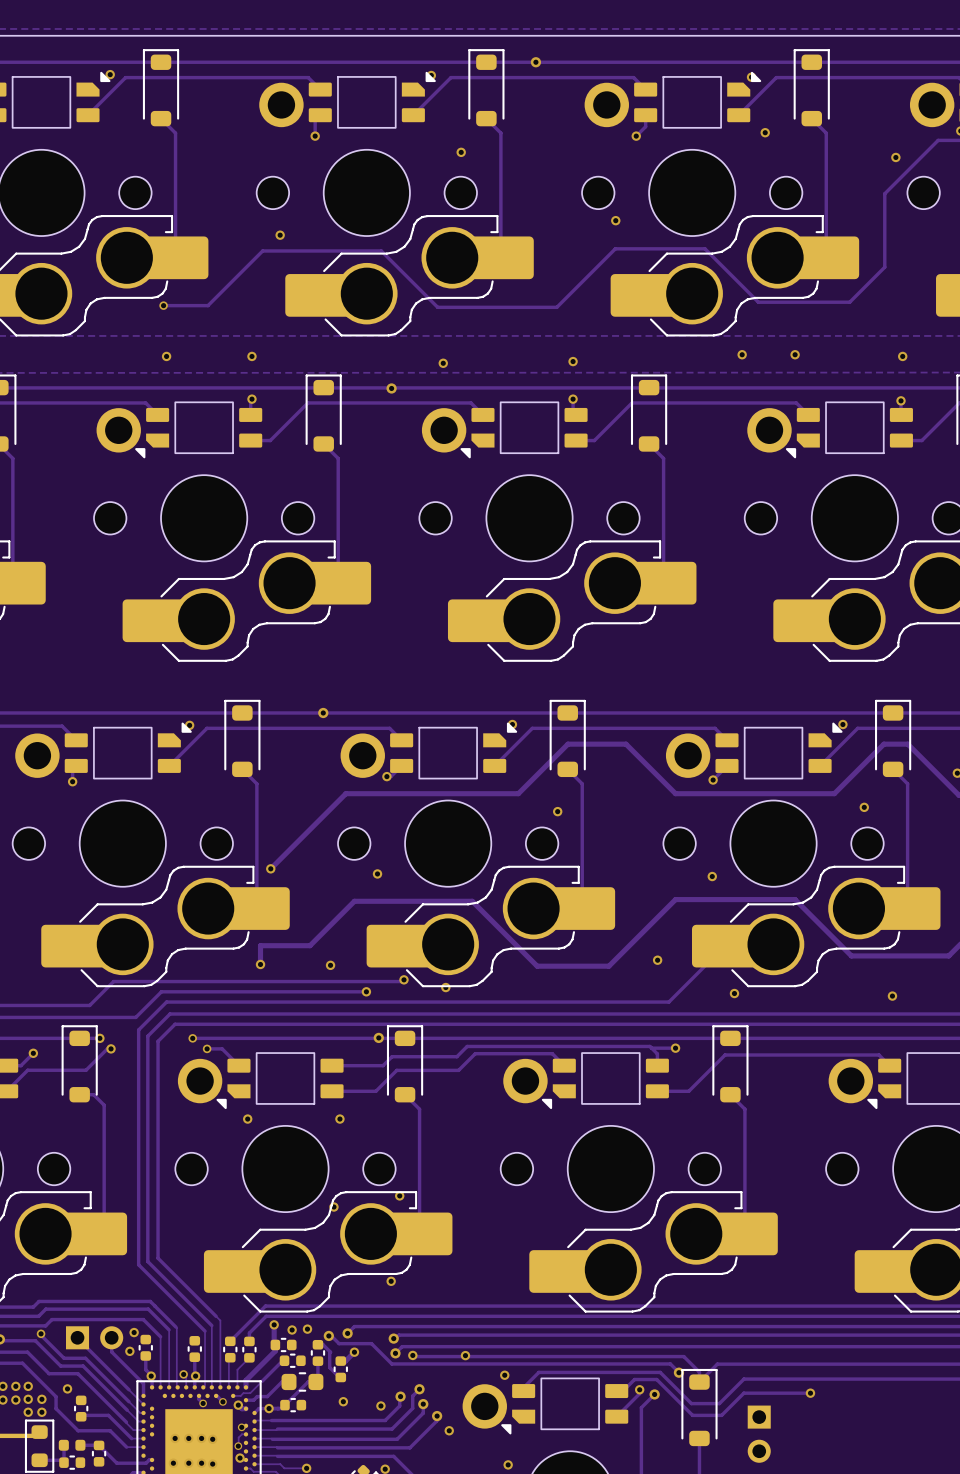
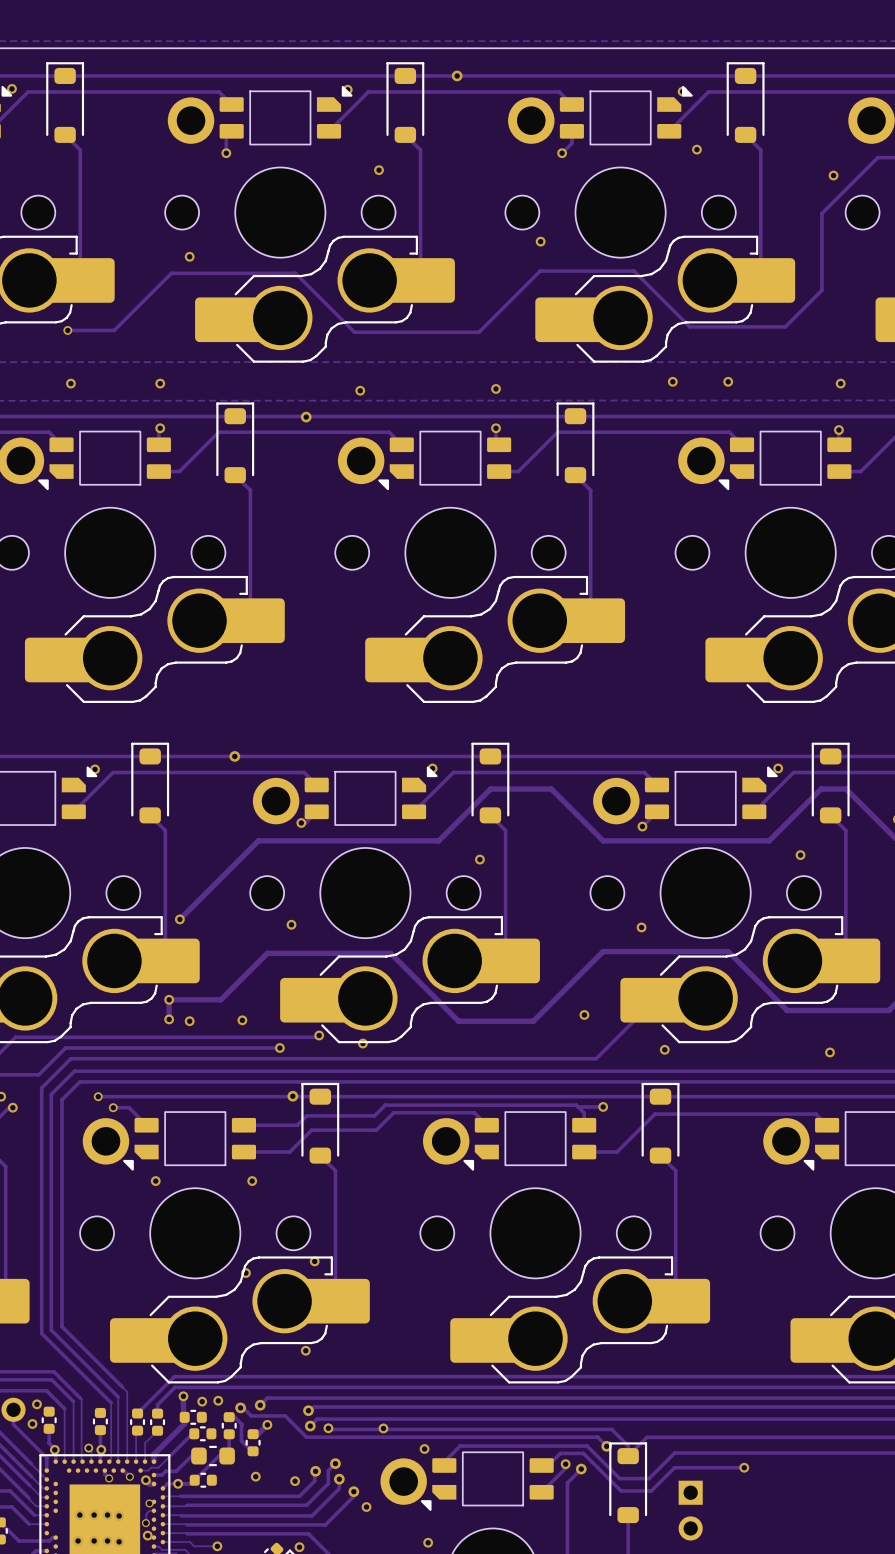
via: none -> (169, 999)
via: none -> (189, 1021)

